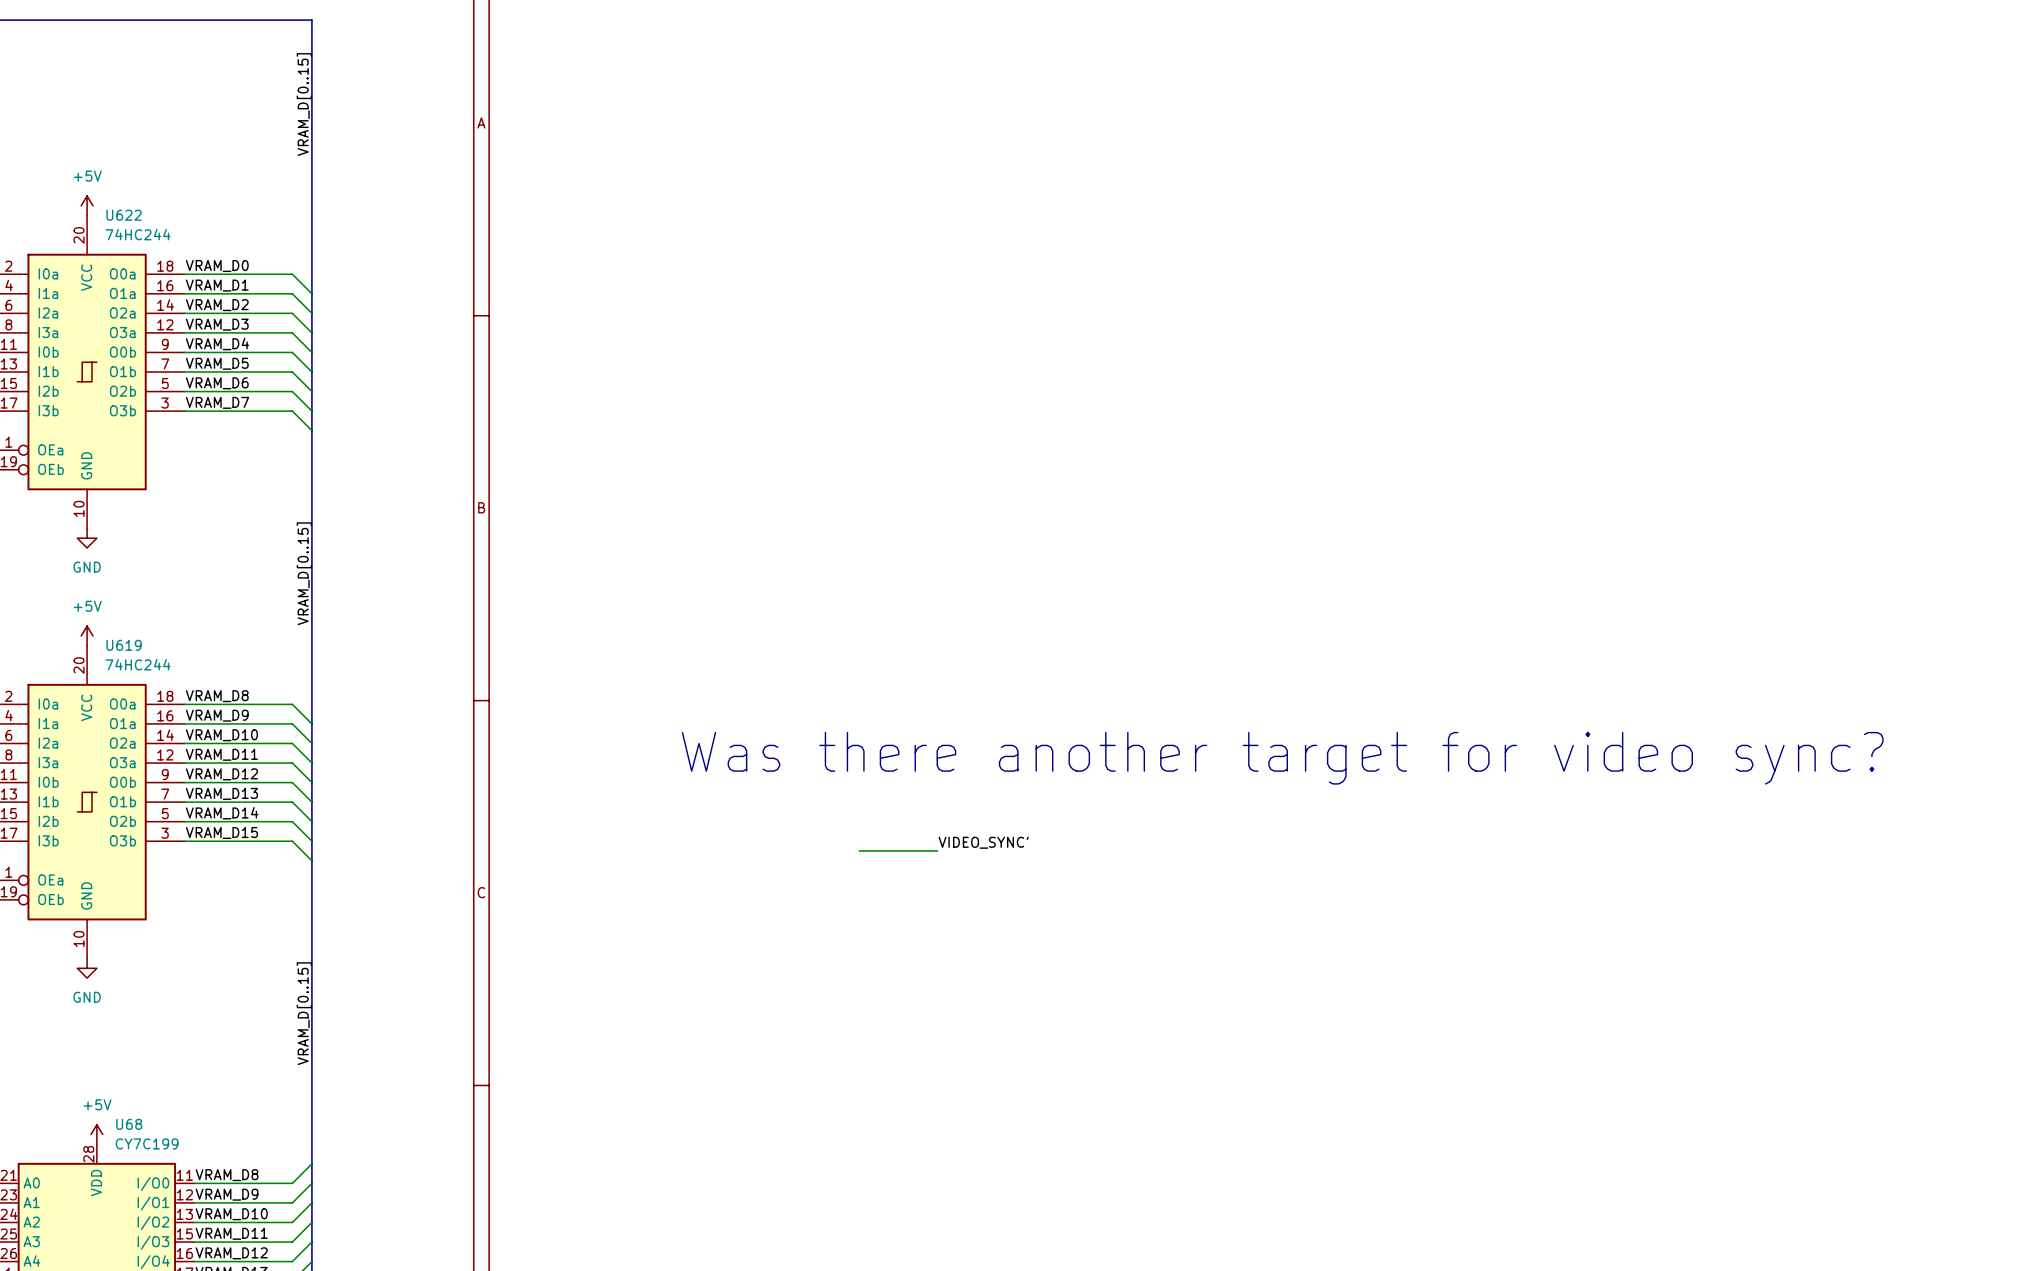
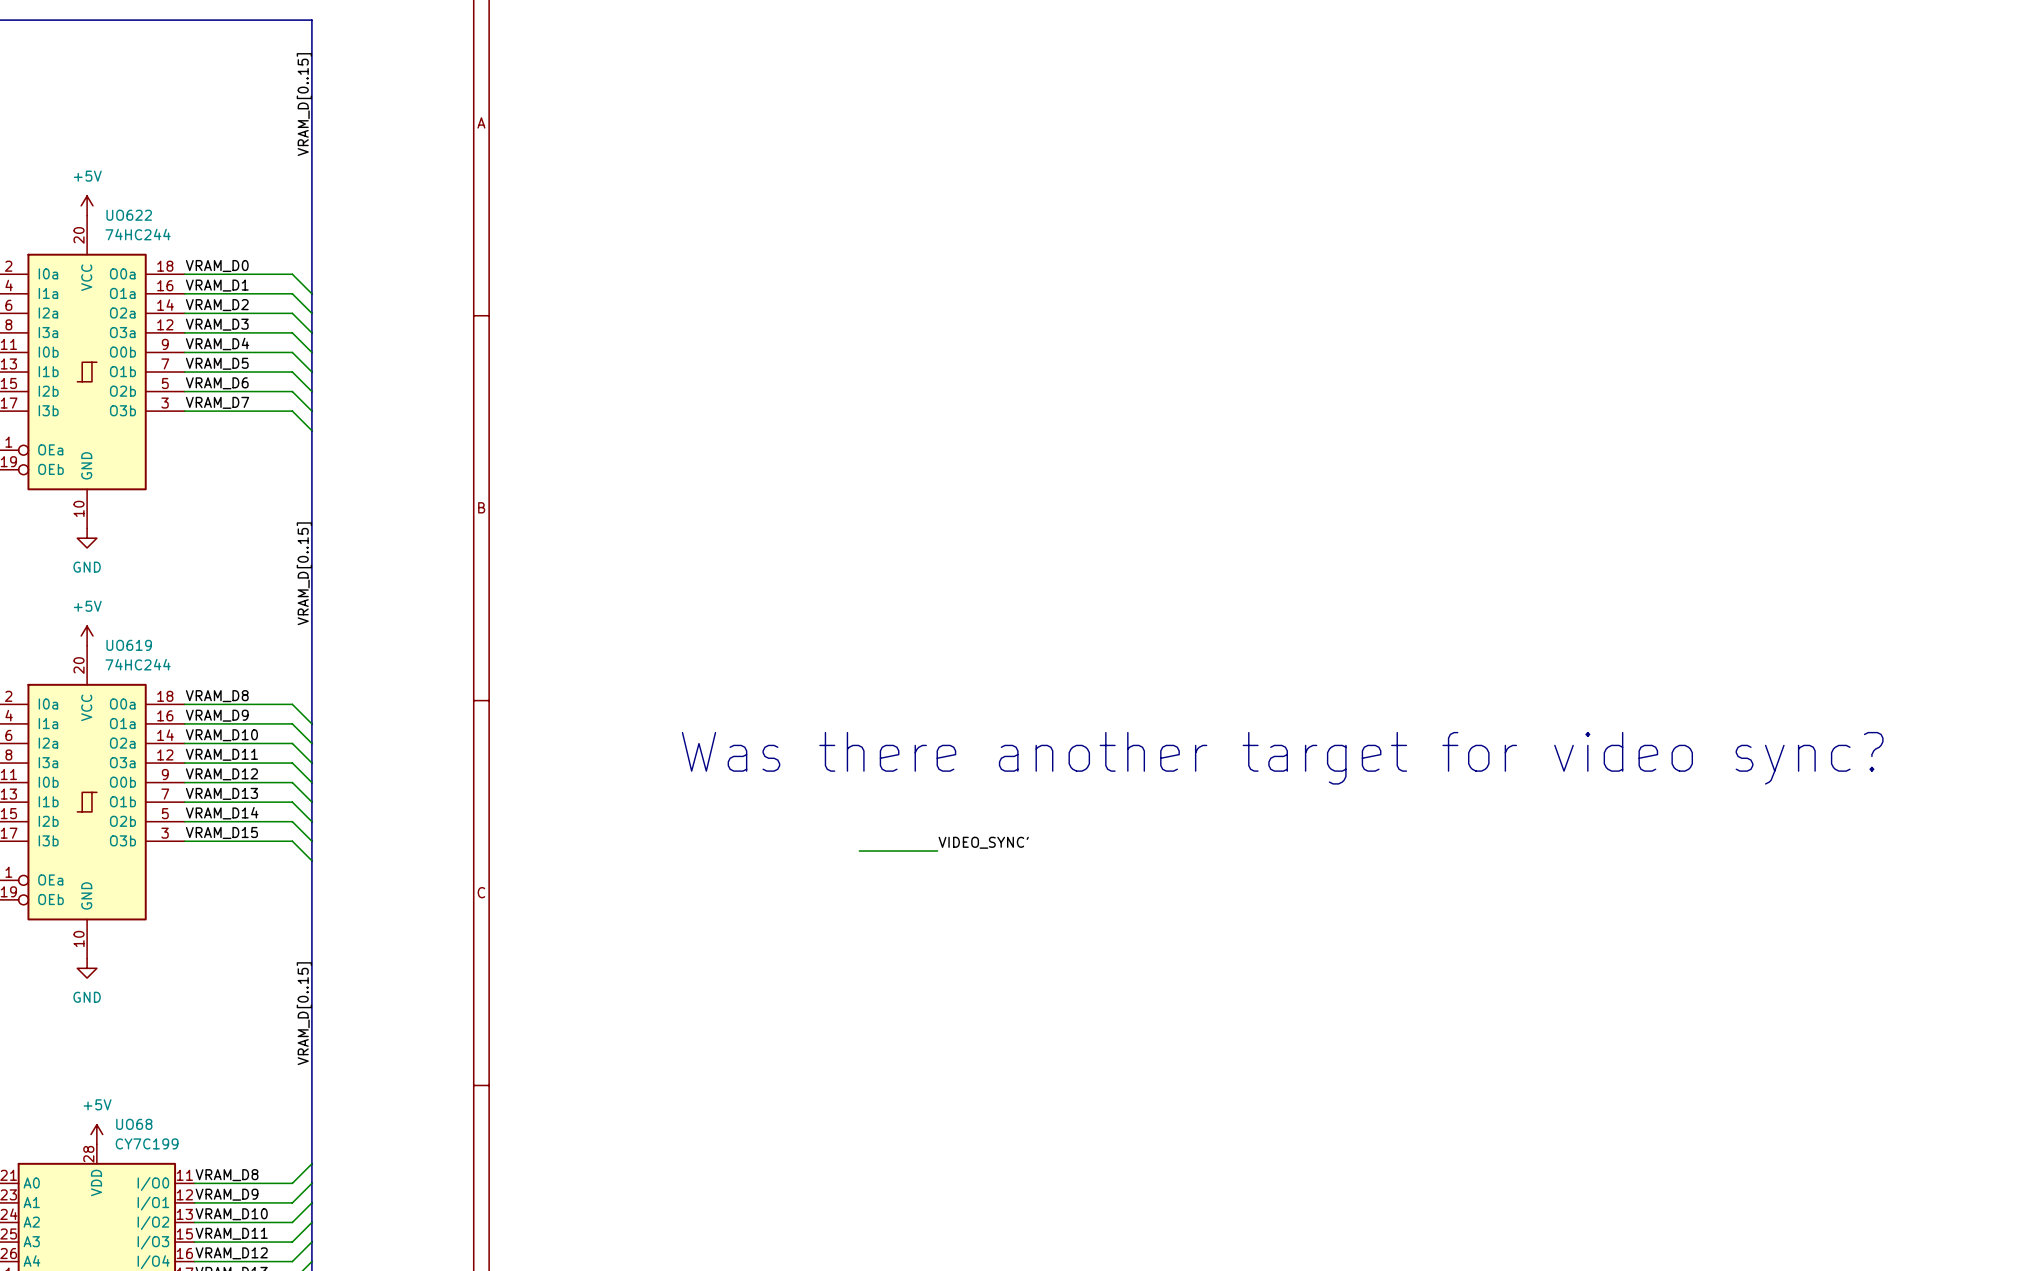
U622 name: U622 (124, 215) -> UO622 (129, 215)
U619 name: U619 (124, 645) -> UO619 (129, 645)
U68 name: U68 (129, 1124) -> UO68 (134, 1124)

